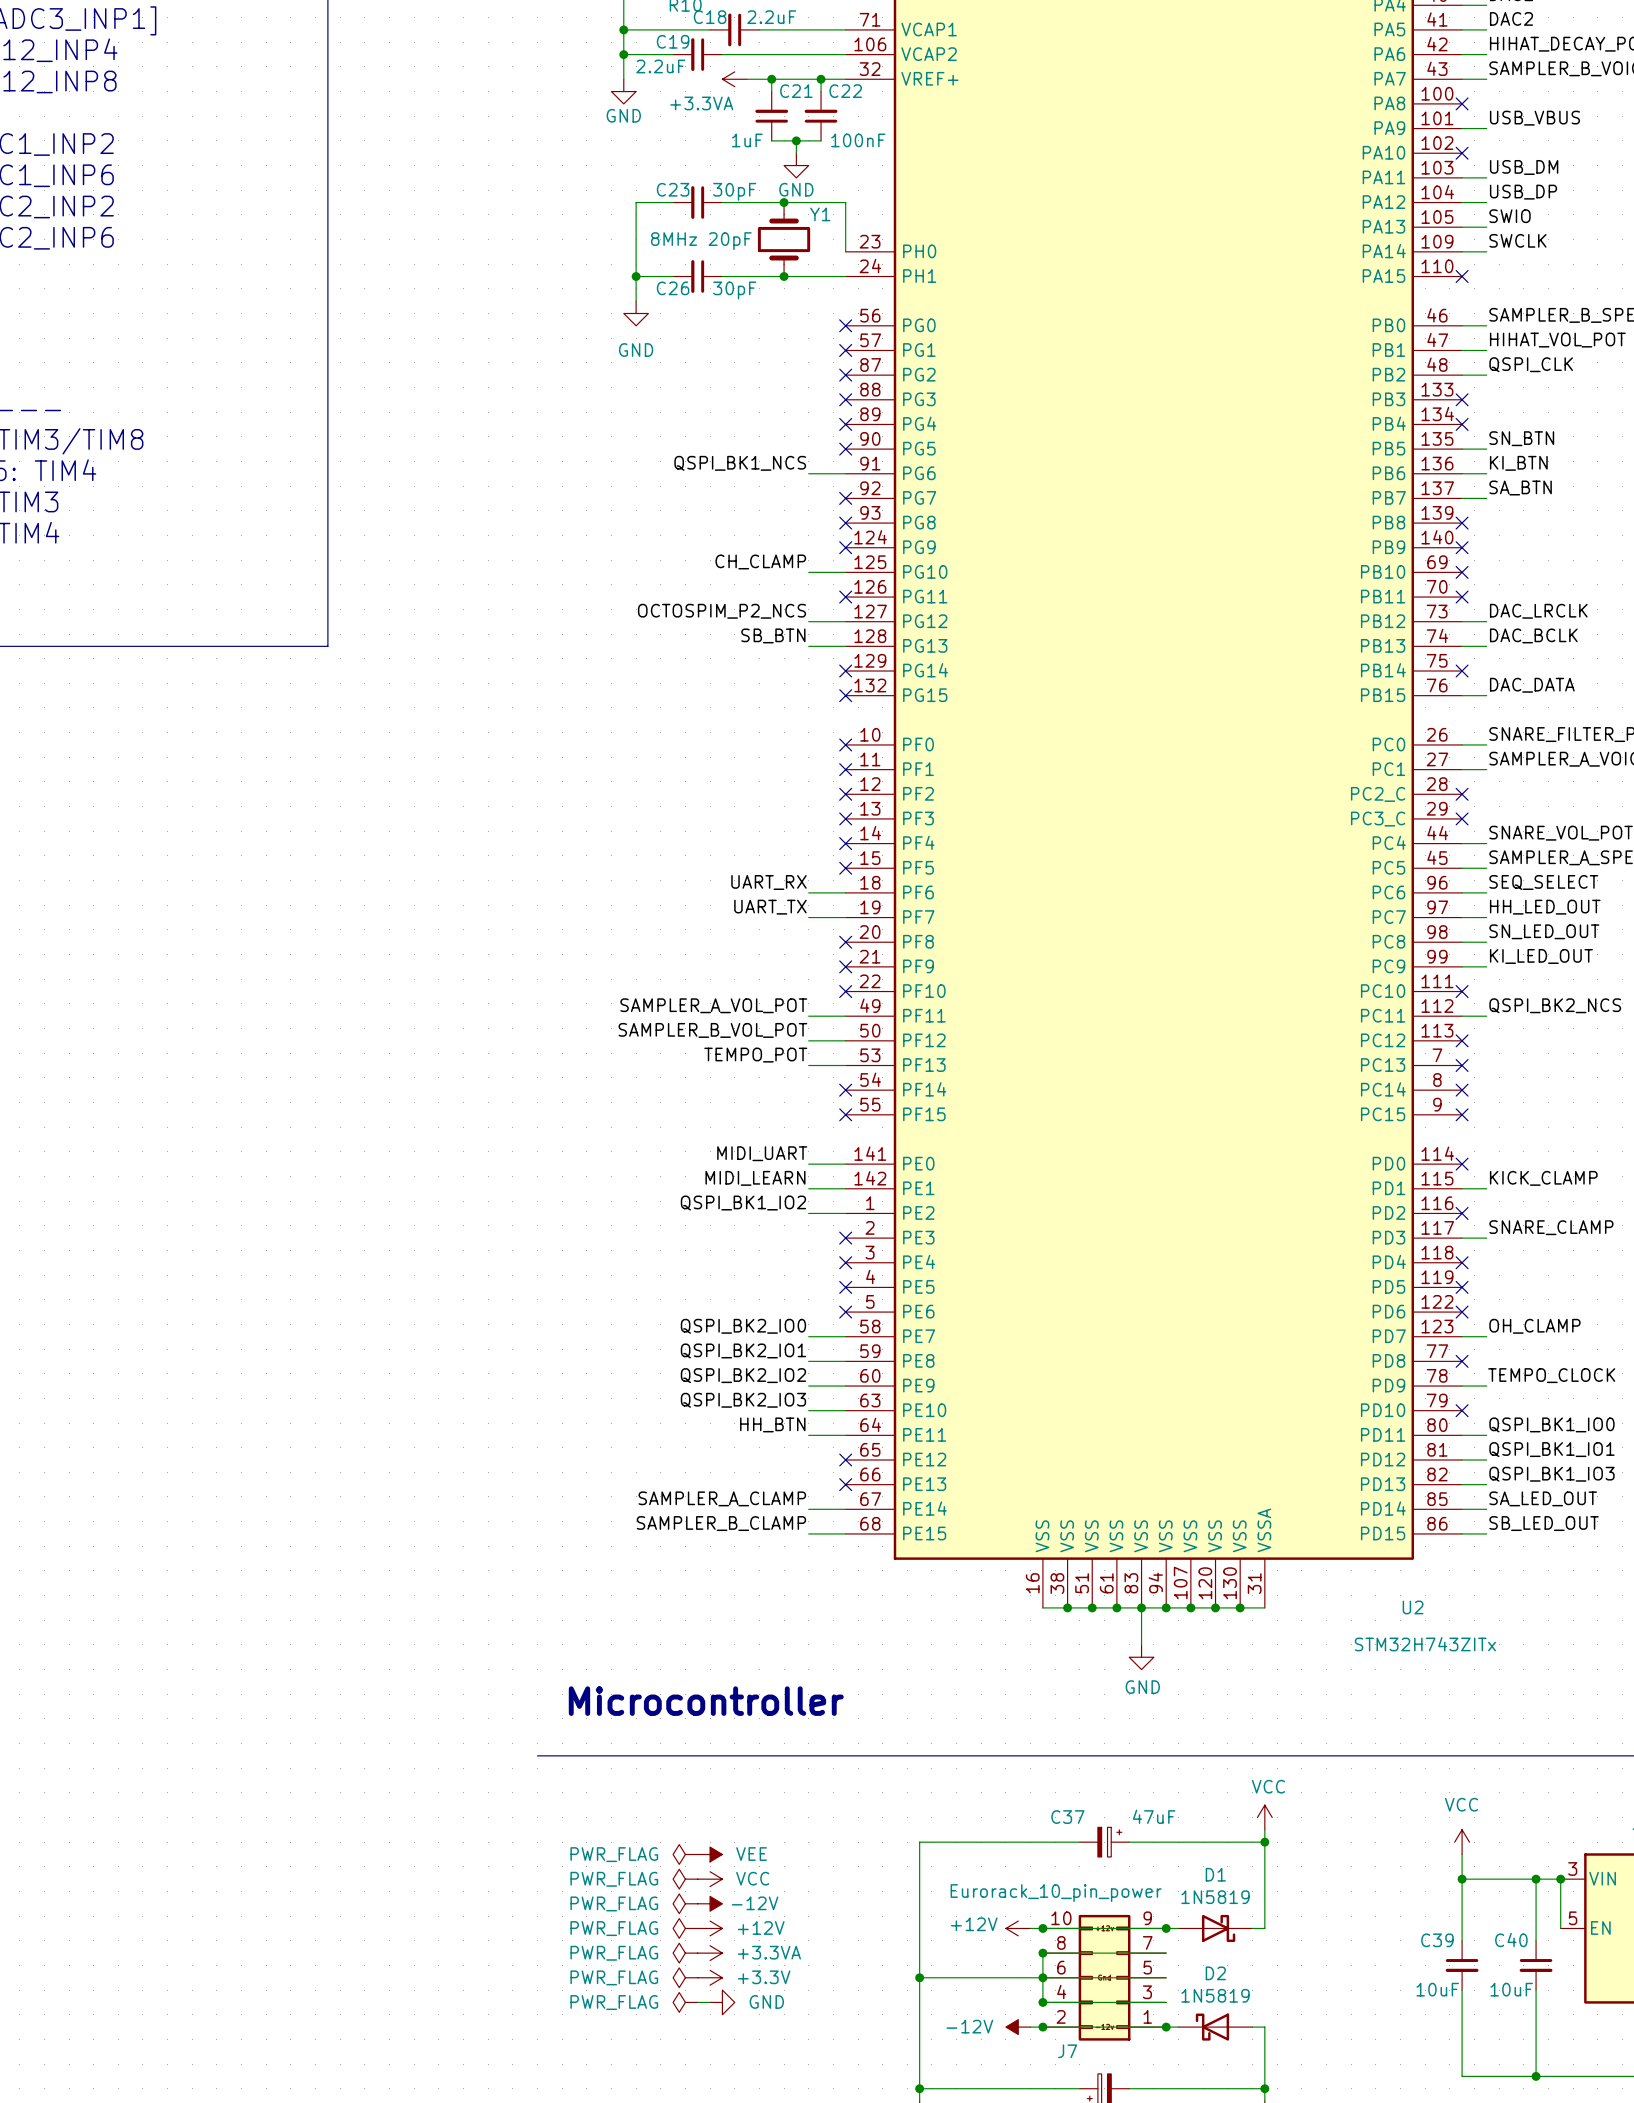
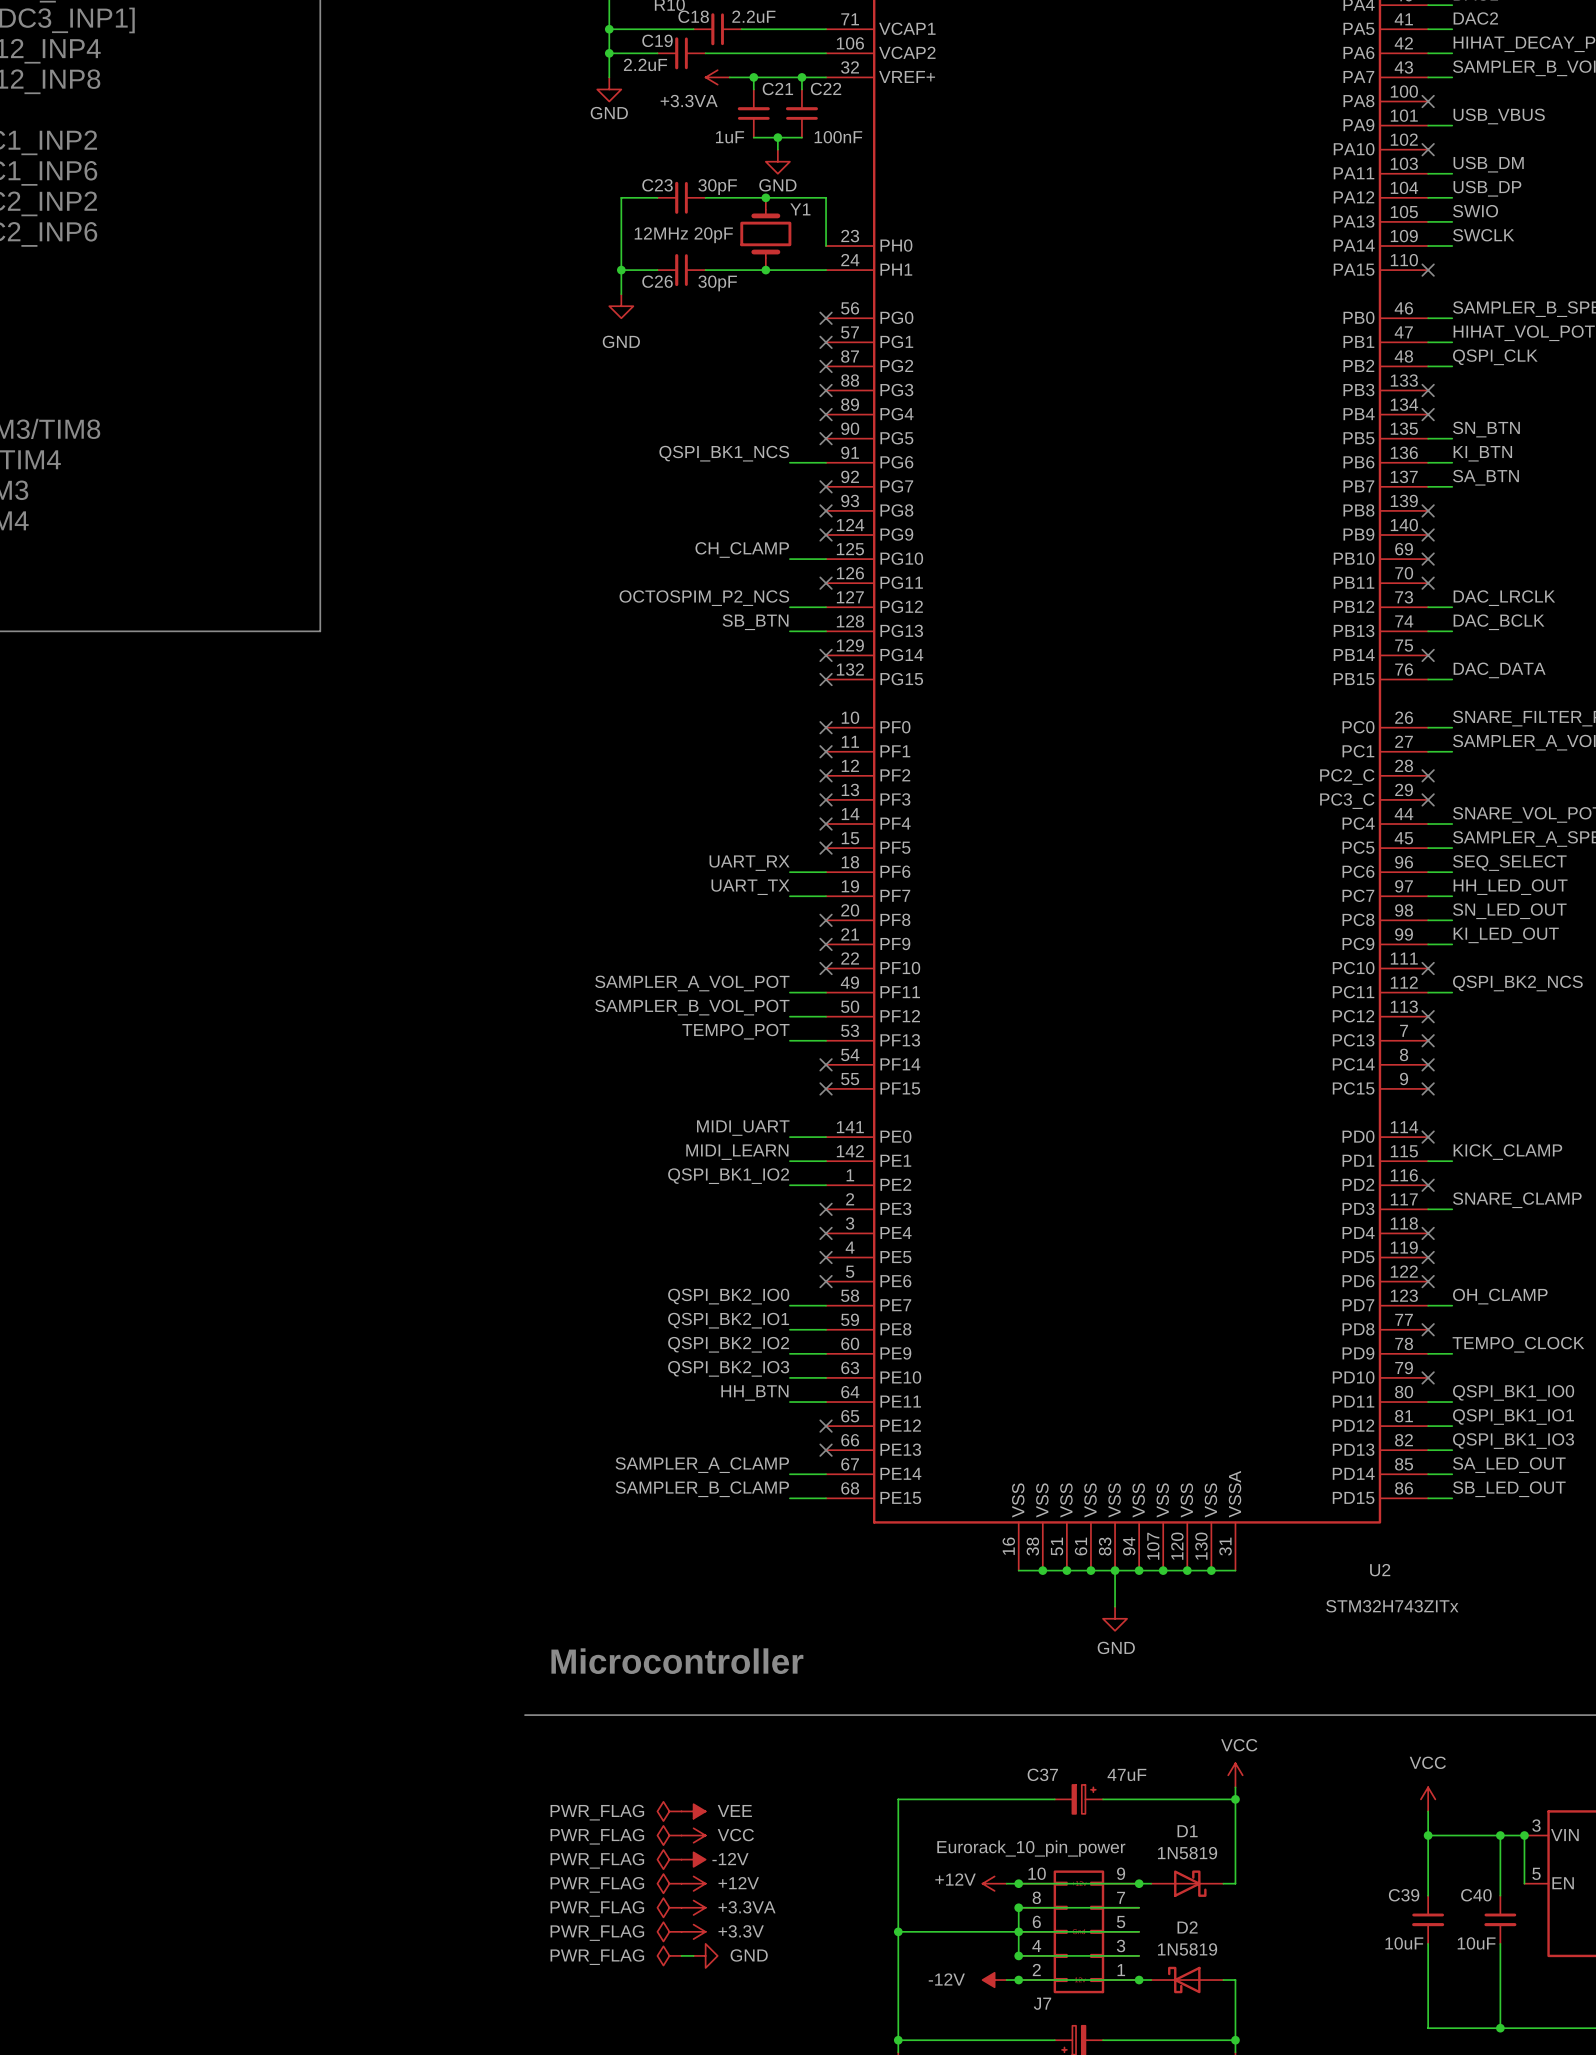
Y1 value: 8MHz 20pF (701, 241) -> 12MHz 20pF (683, 235)

